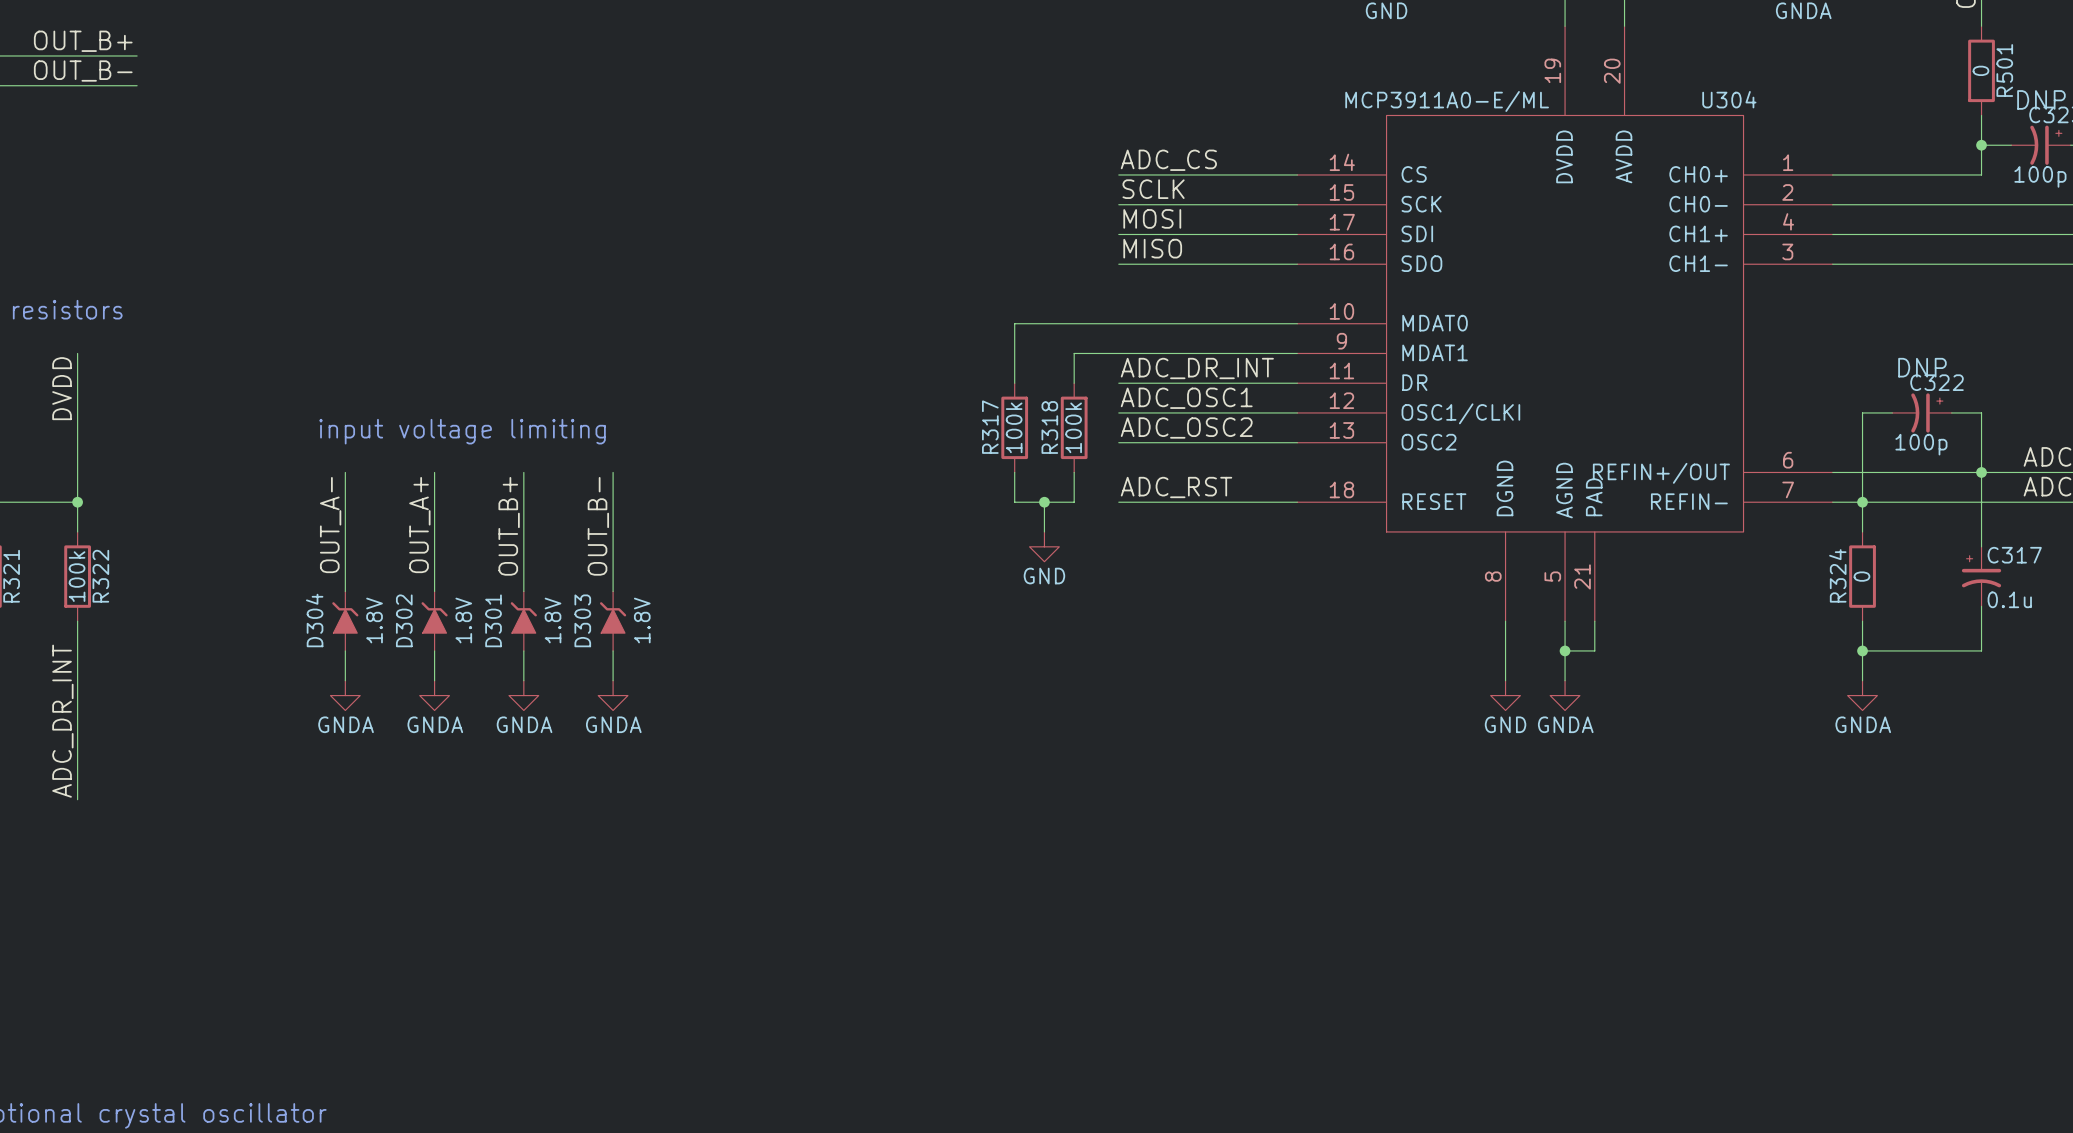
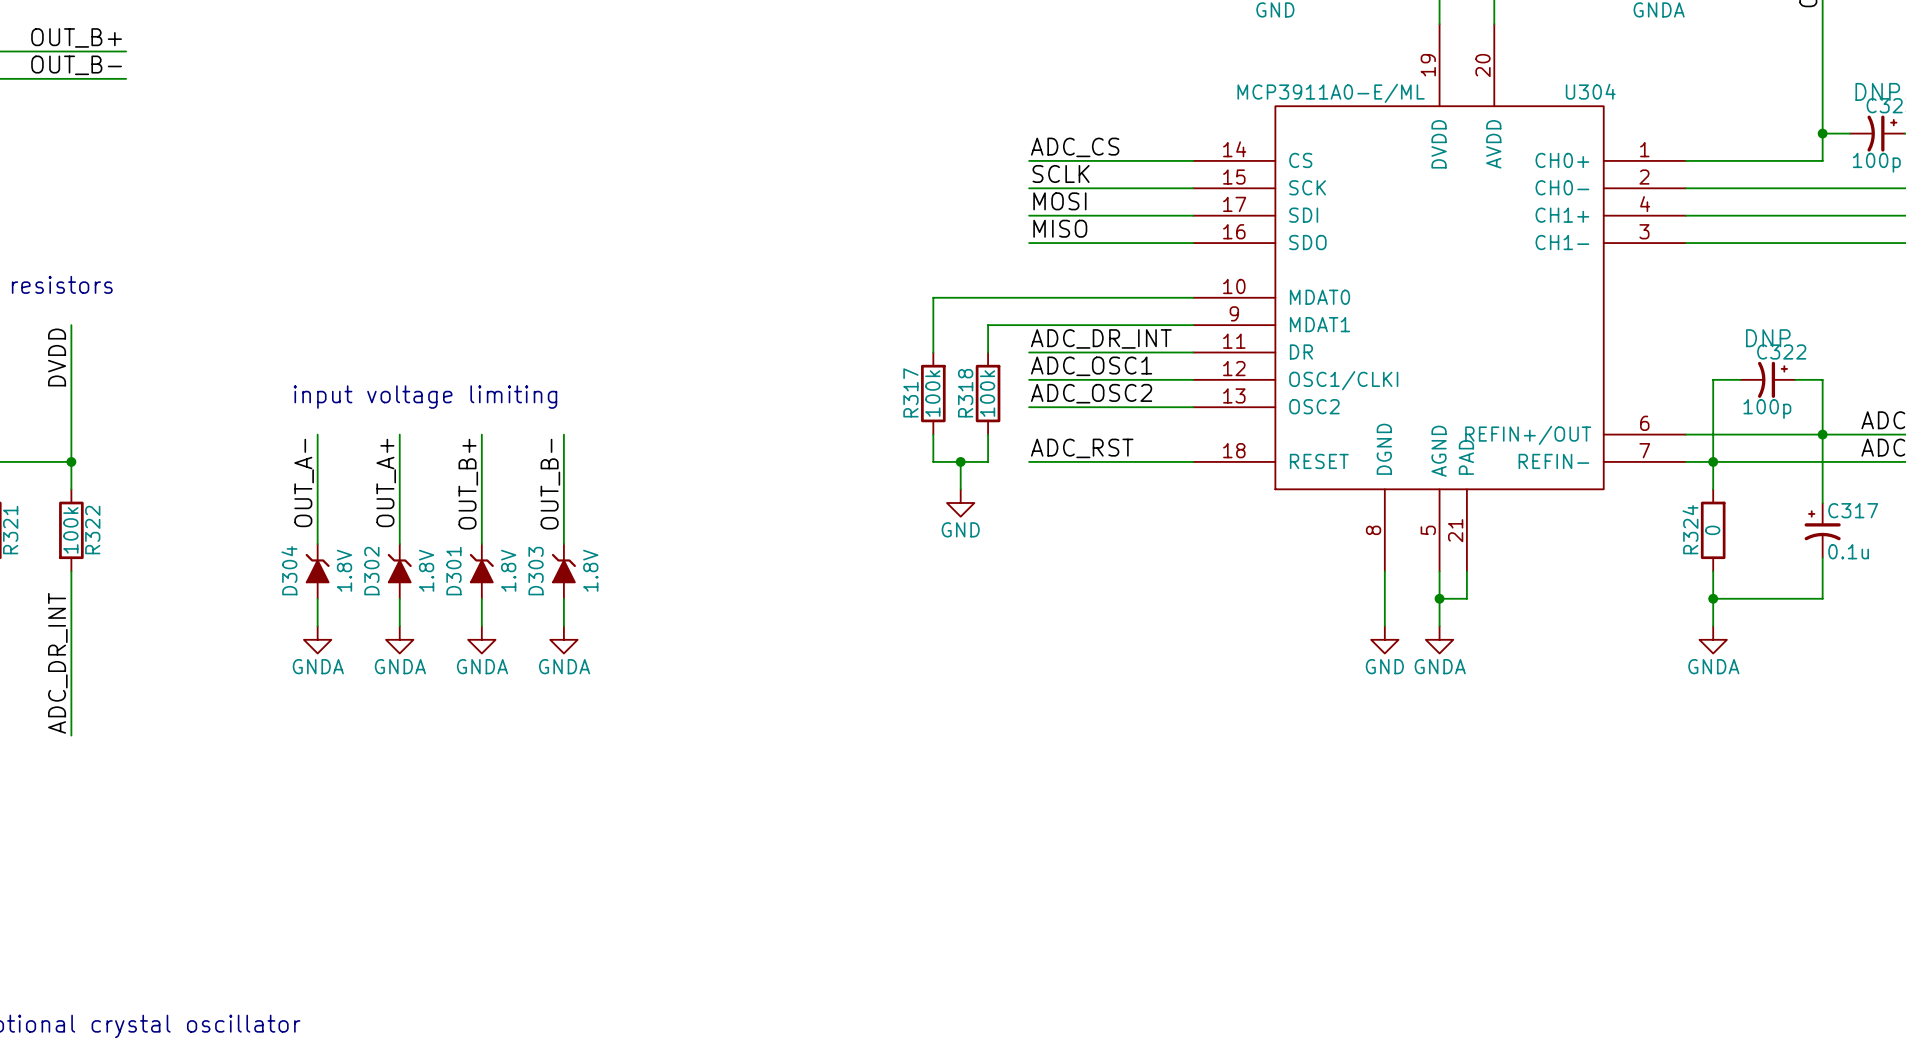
wire: none -> (1822, 24) (1822, 106)
R501: 0 (1981, 70) -> none

